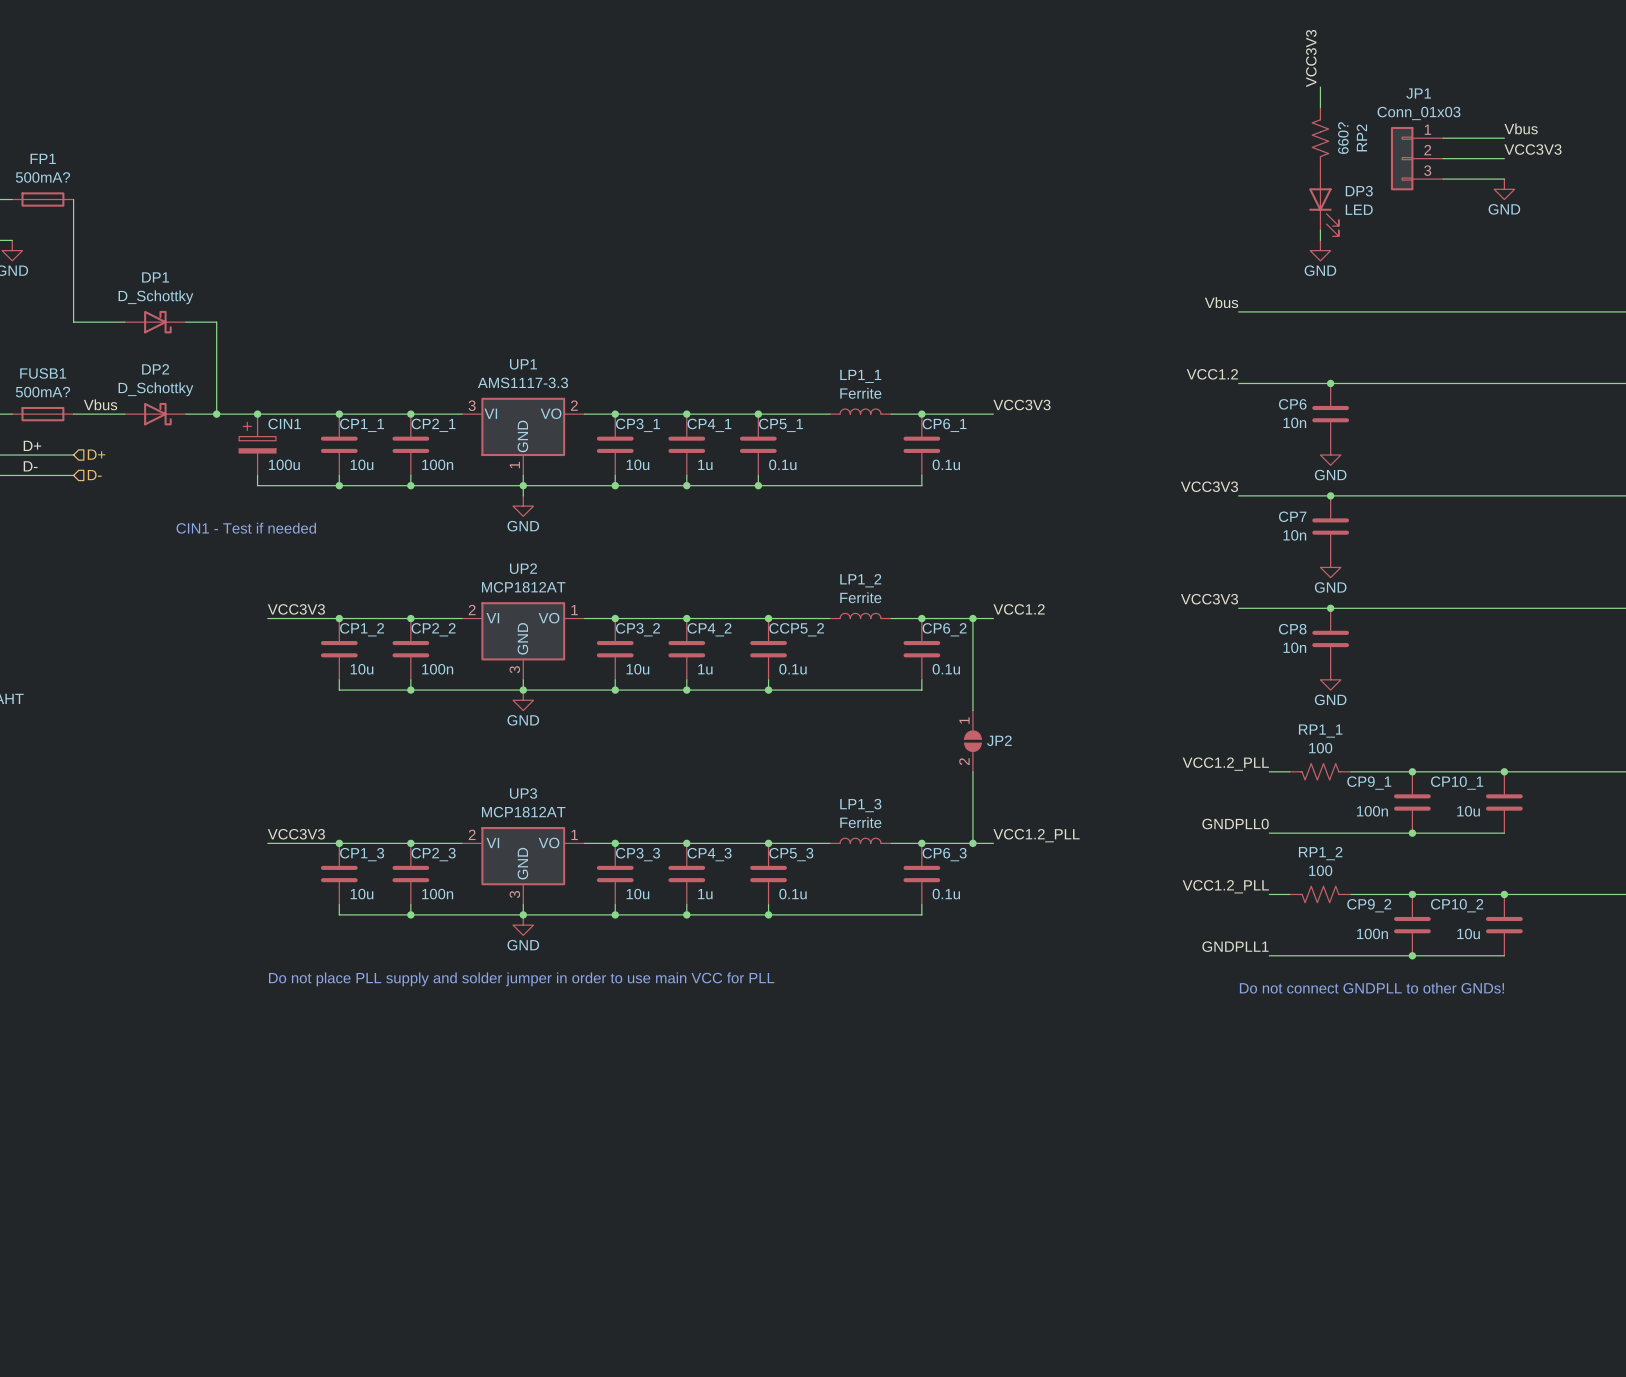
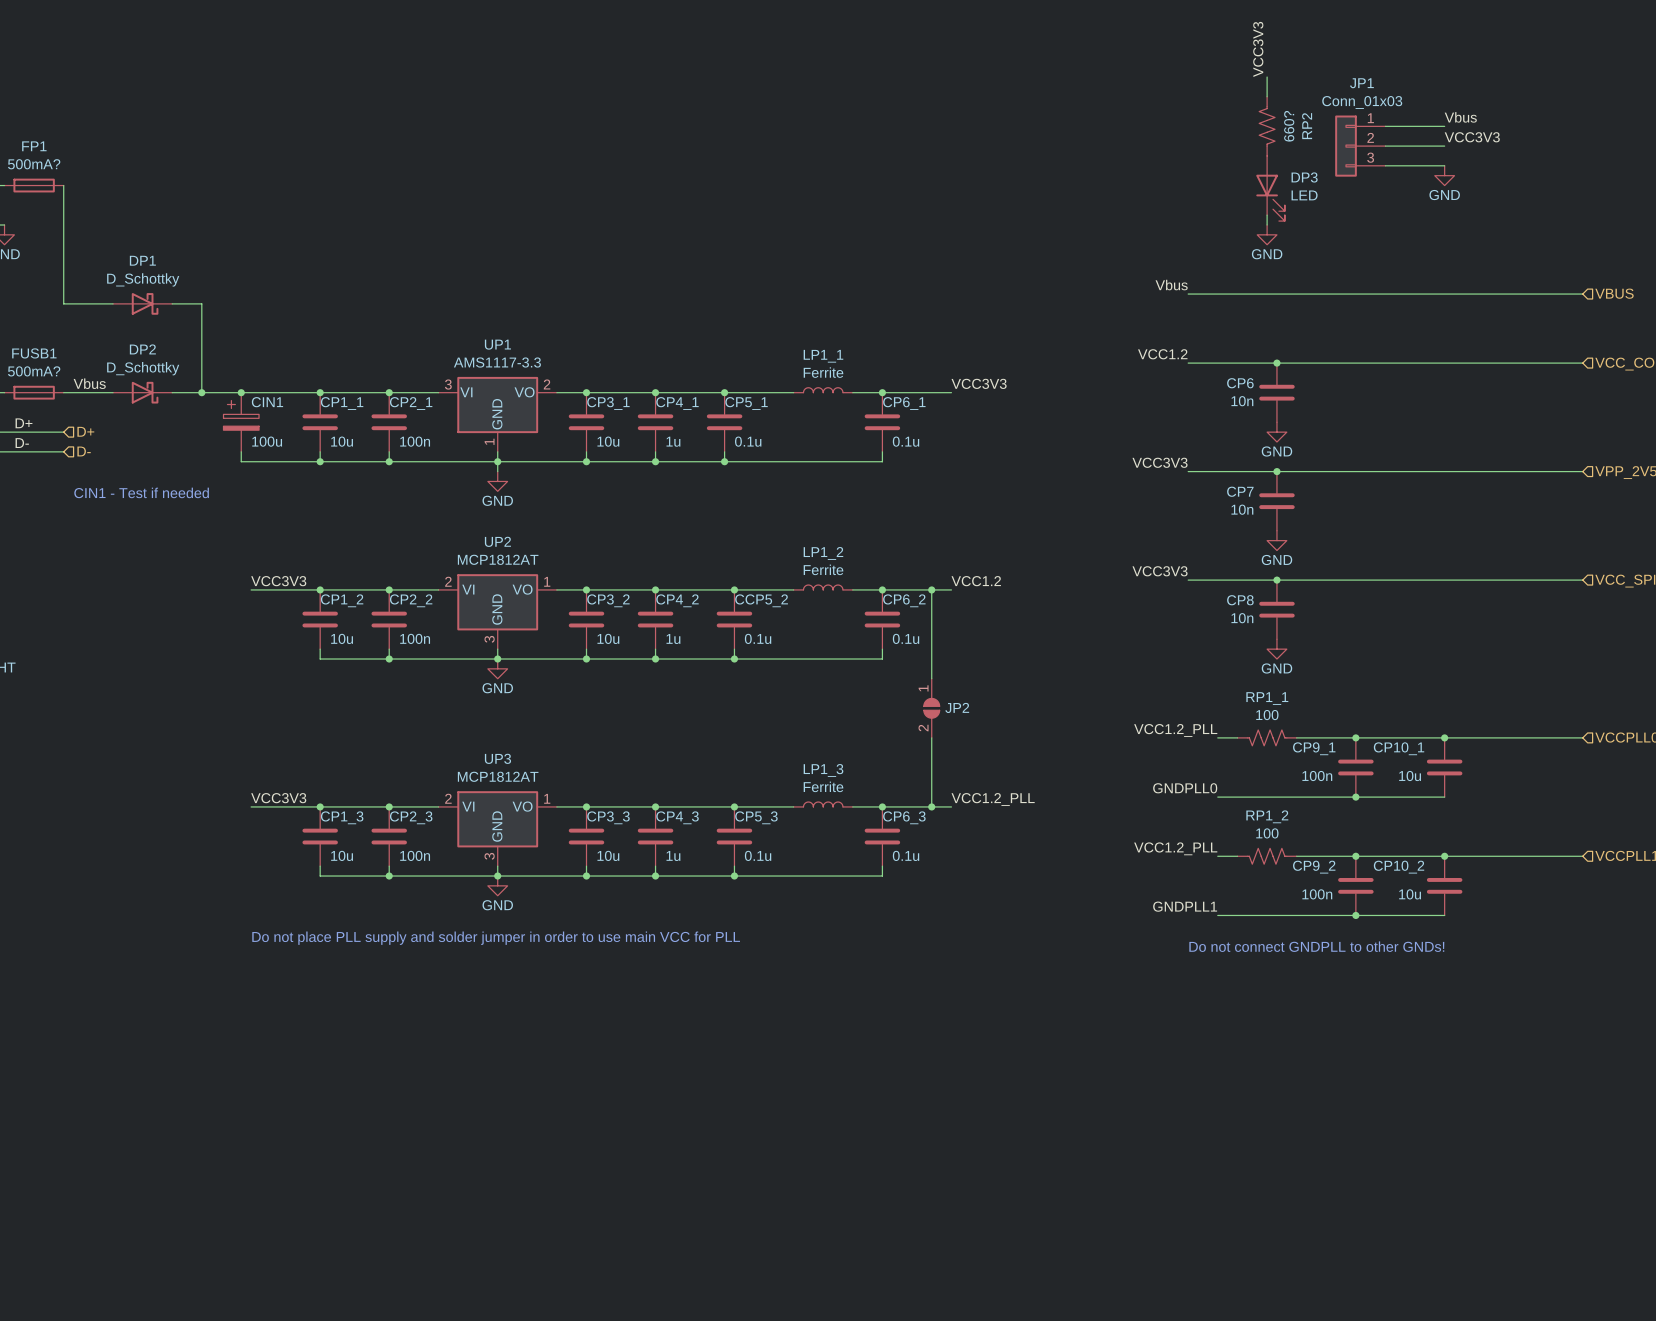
text position: CIN1 - Test if needed (246, 528) -> CIN1 - Test if needed (141, 492)

